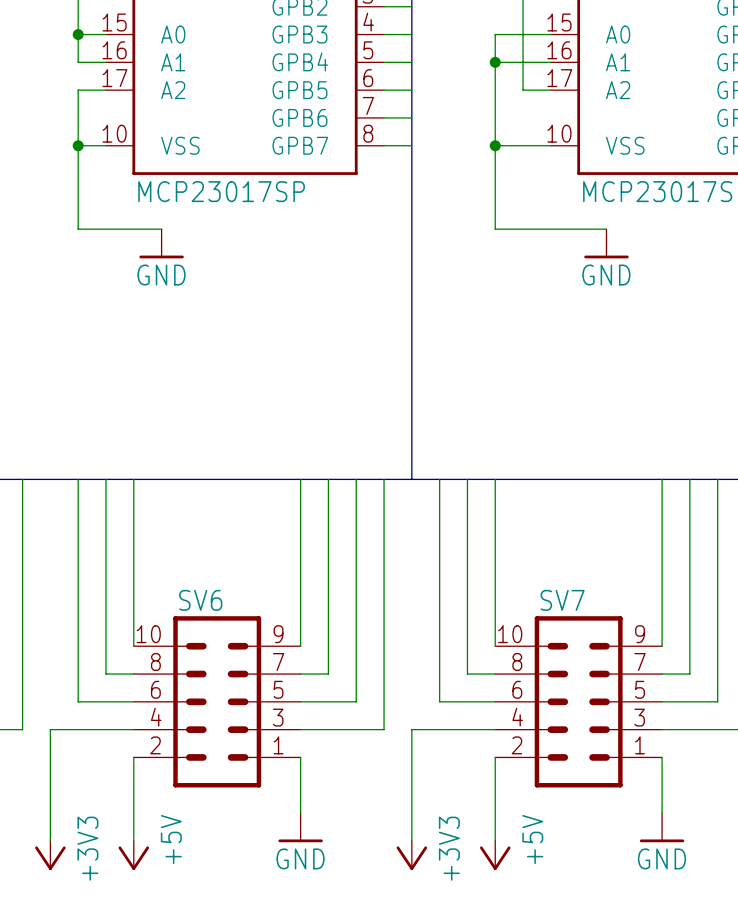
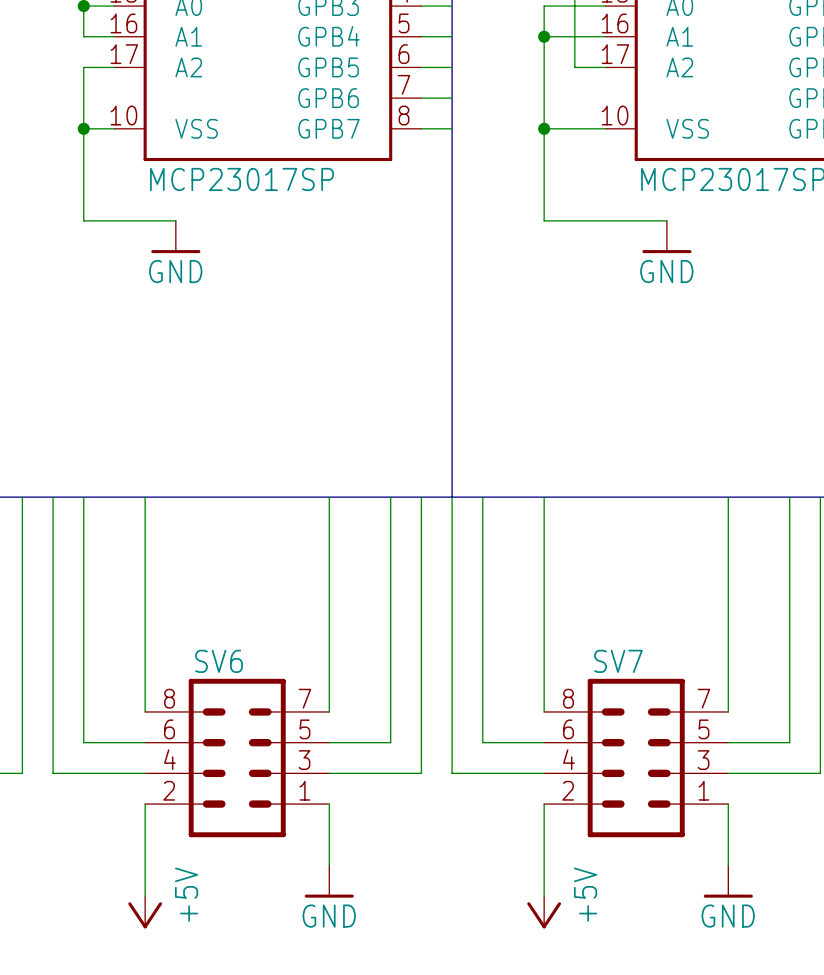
wire: (105, 479) (105, 674) (133, 674) -> (145, 681) (145, 711)
wire: (328, 479) (328, 674) (300, 674) -> (329, 681) (329, 711)
wire: (467, 479) (467, 674) (495, 674) -> (544, 681) (544, 711)
wire: (689, 479) (689, 674) (662, 674) -> (728, 681) (728, 711)
SV6 symbol: [133, 616, 301, 788] -> [145, 678, 330, 838]
SV7 symbol: [495, 616, 663, 788] -> [544, 678, 729, 838]
wire: (50, 729) (50, 840) -> (53, 773) (53, 497)
wire: (411, 729) (411, 840) -> (452, 773) (452, 497)
power symbol: +3V3 (50, 855) -> none
power symbol: +3V3 (411, 855) -> none

